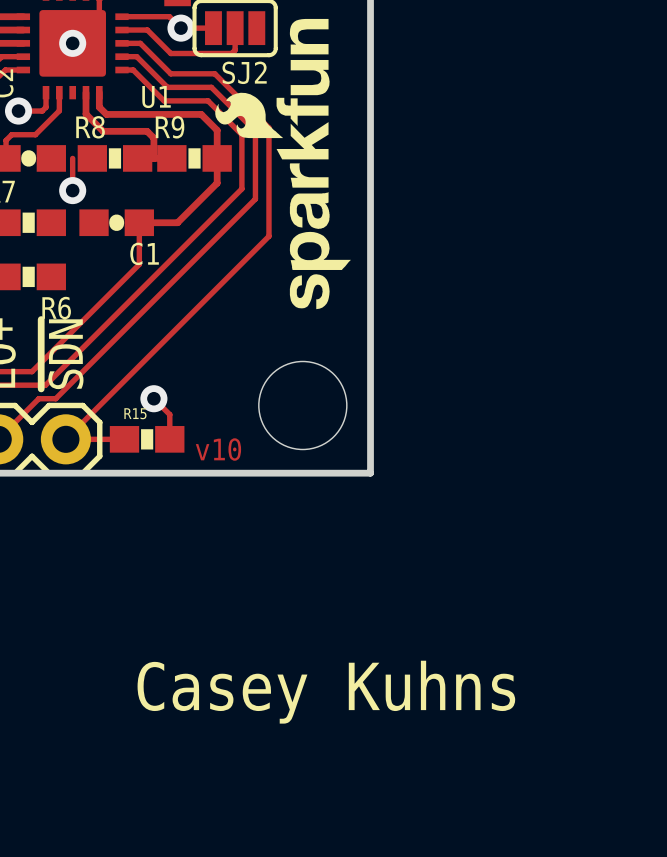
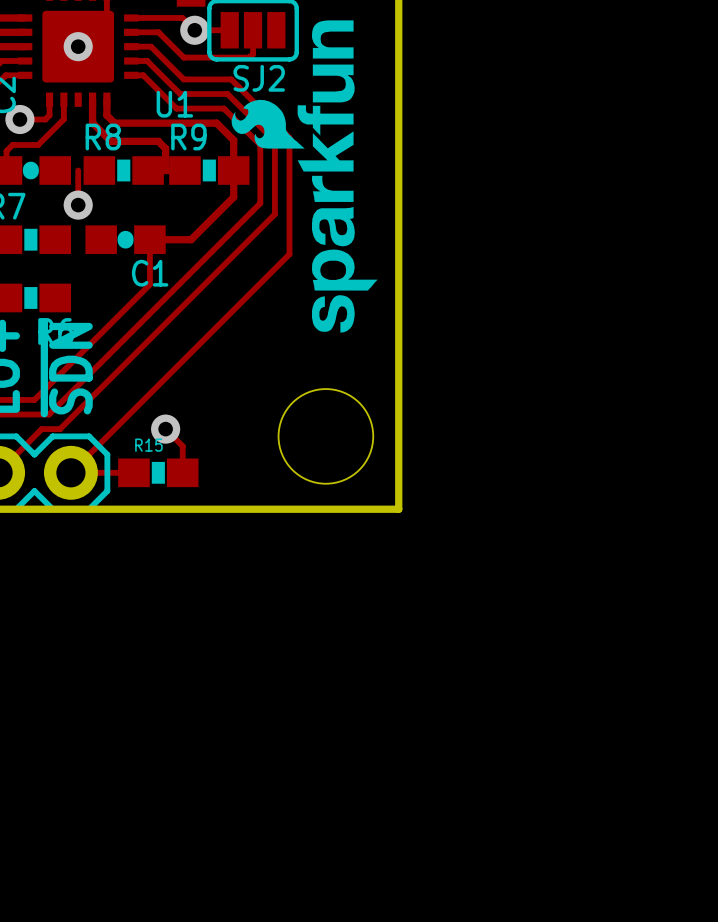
text: v10 (218, 449) -> none
text: Casey Kuhns (326, 692) -> none

